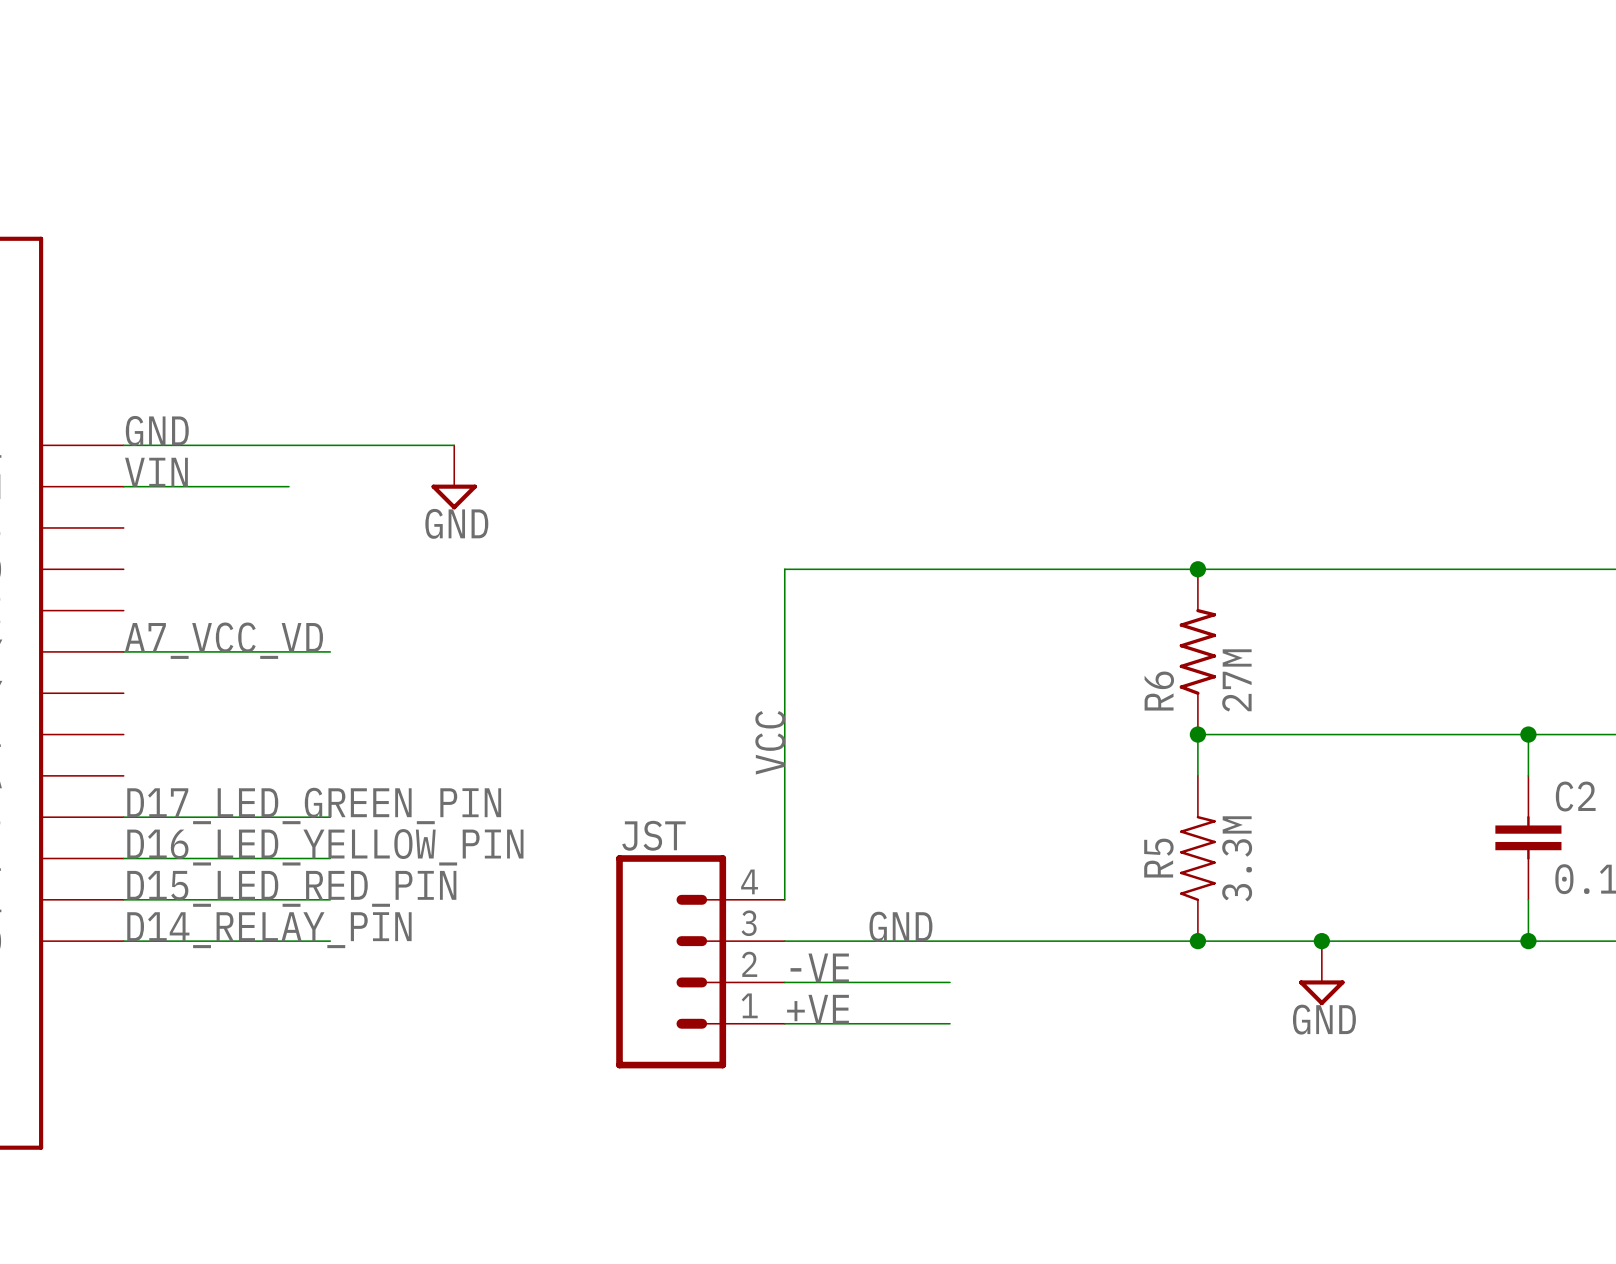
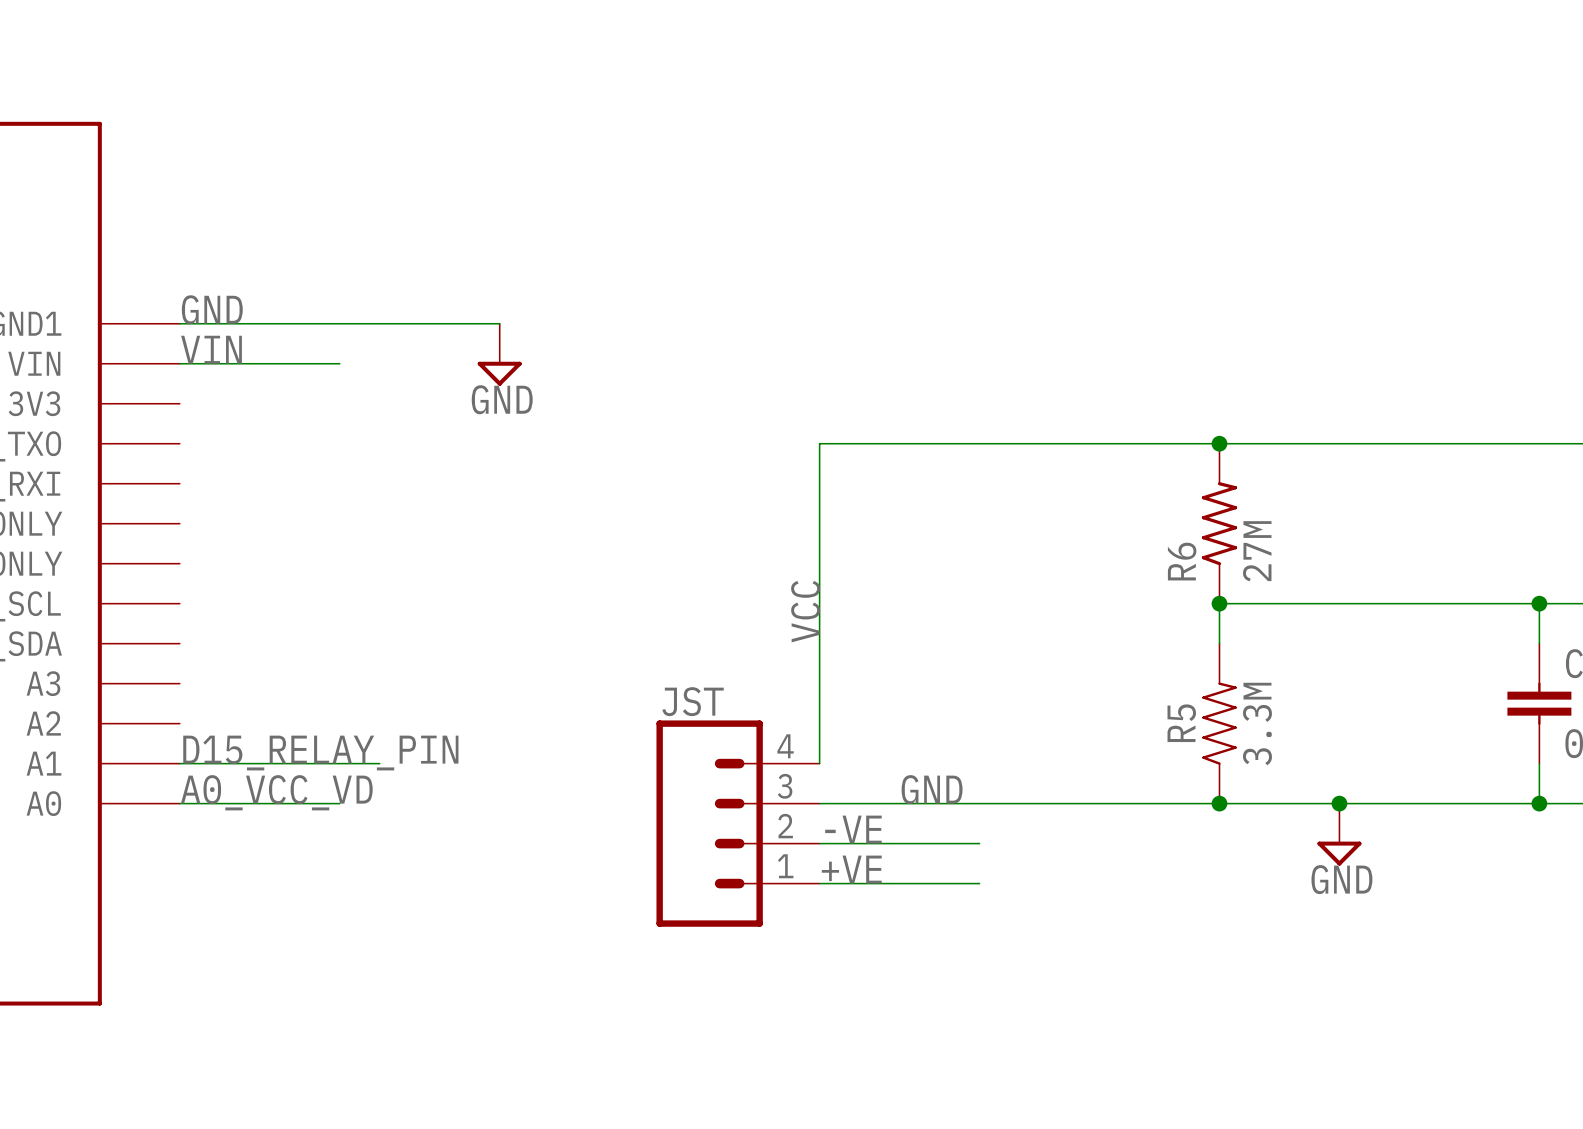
label: A7_VCC_VD (223, 640) -> none
wire: (123, 651) (330, 651) -> none
label: D17_LED_GREEN_PIN (314, 805) -> none
wire: (123, 817) (330, 817) -> none
label: D16_LED_YELLOW_PIN (325, 847) -> none
wire: (123, 858) (330, 858) -> none
label: D15_LED_RED_PIN (291, 888) -> D15_RELAY_PIN (320, 753)
label: D14_RELAY_PIN (269, 930) -> A0_VCC_VD (276, 792)
wire: (288, 941) (330, 941) -> none

